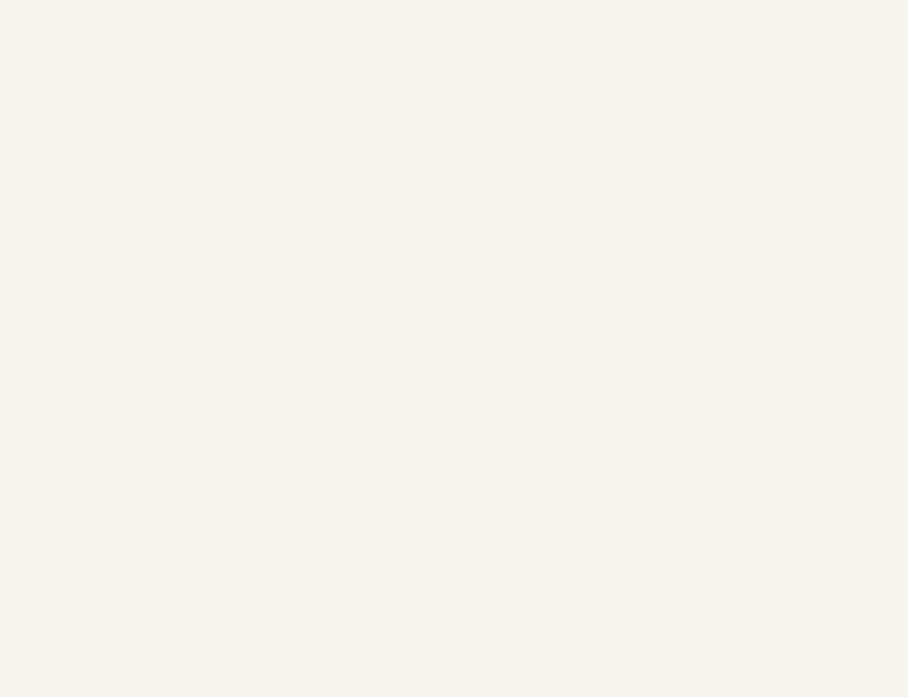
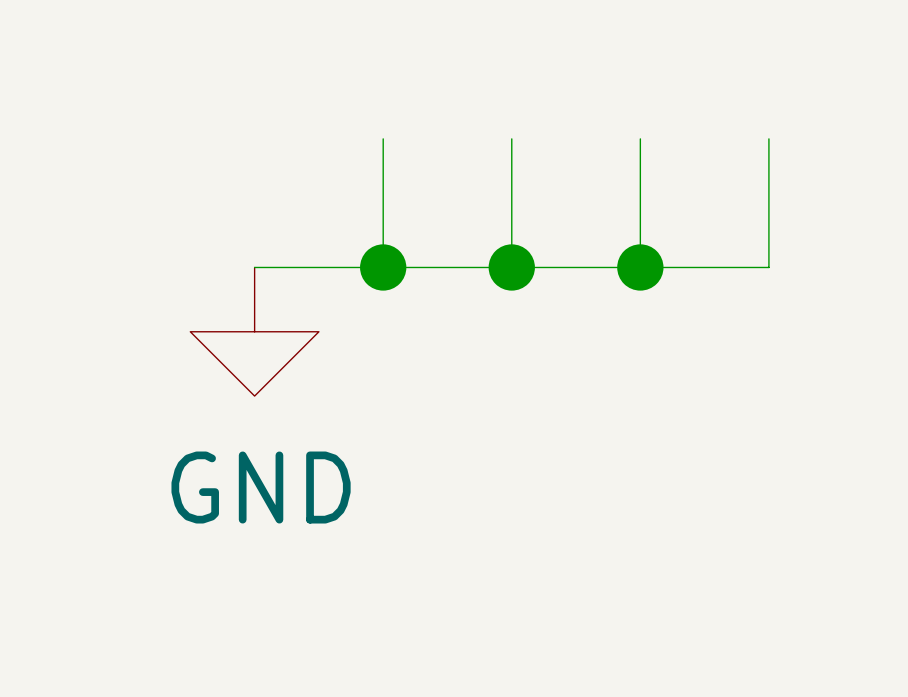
wire: none -> (383, 138) (383, 267)
wire: none -> (511, 138) (511, 267)
wire: none -> (640, 138) (640, 267)
wire: none -> (768, 138) (768, 267) (254, 267)
junction: none -> (383, 267)
junction: none -> (511, 267)
junction: none -> (640, 267)
power symbol: none -> GND (254, 331)

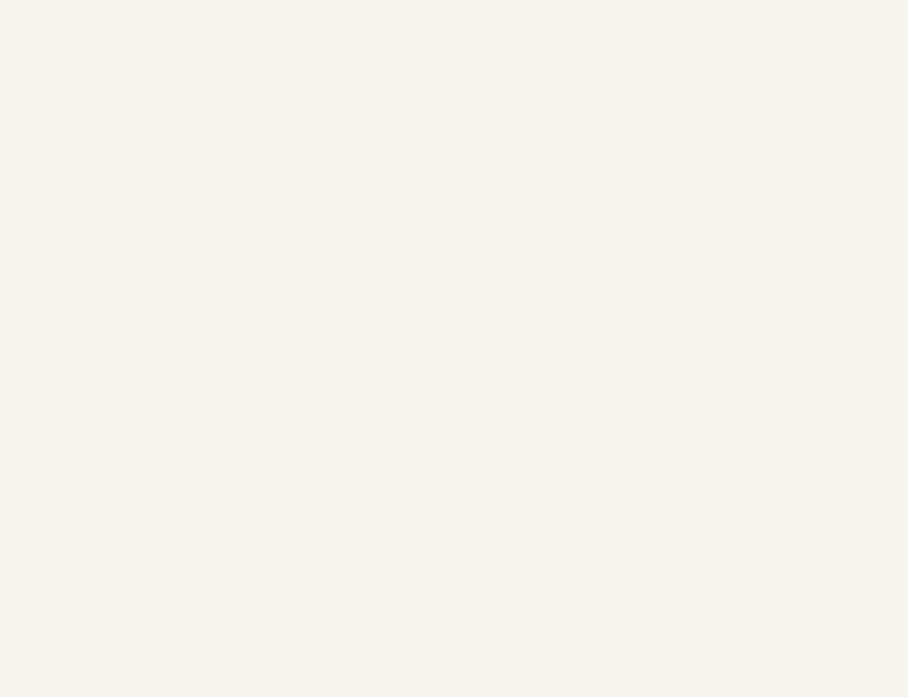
wire: (383, 138) (383, 267) -> none
wire: (511, 138) (511, 267) -> none
wire: (640, 138) (640, 267) -> none
wire: (768, 138) (768, 267) (254, 267) -> none
junction: (383, 267) -> none
junction: (511, 267) -> none
junction: (640, 267) -> none
power symbol: GND (254, 331) -> none

